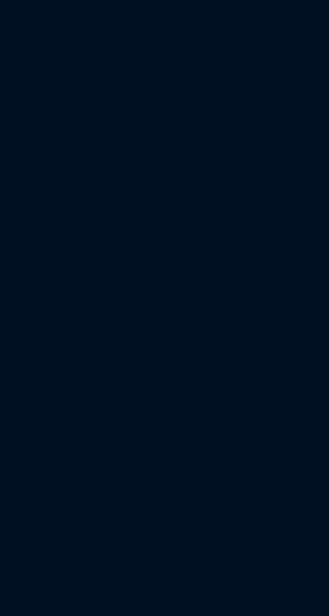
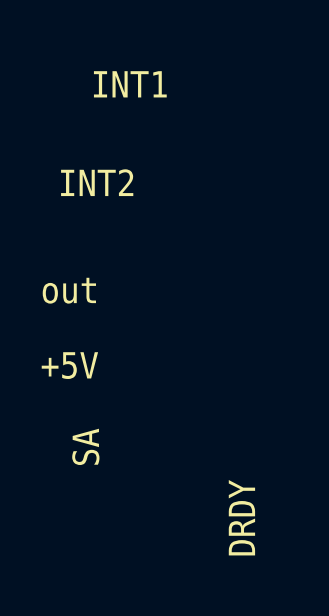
text: none -> INT1 (130, 84)
text: none -> INT2 (97, 182)
text: none -> out (69, 290)
text: none -> +5V (69, 365)
text: none -> SA (85, 446)
text: none -> DRDY (241, 517)

